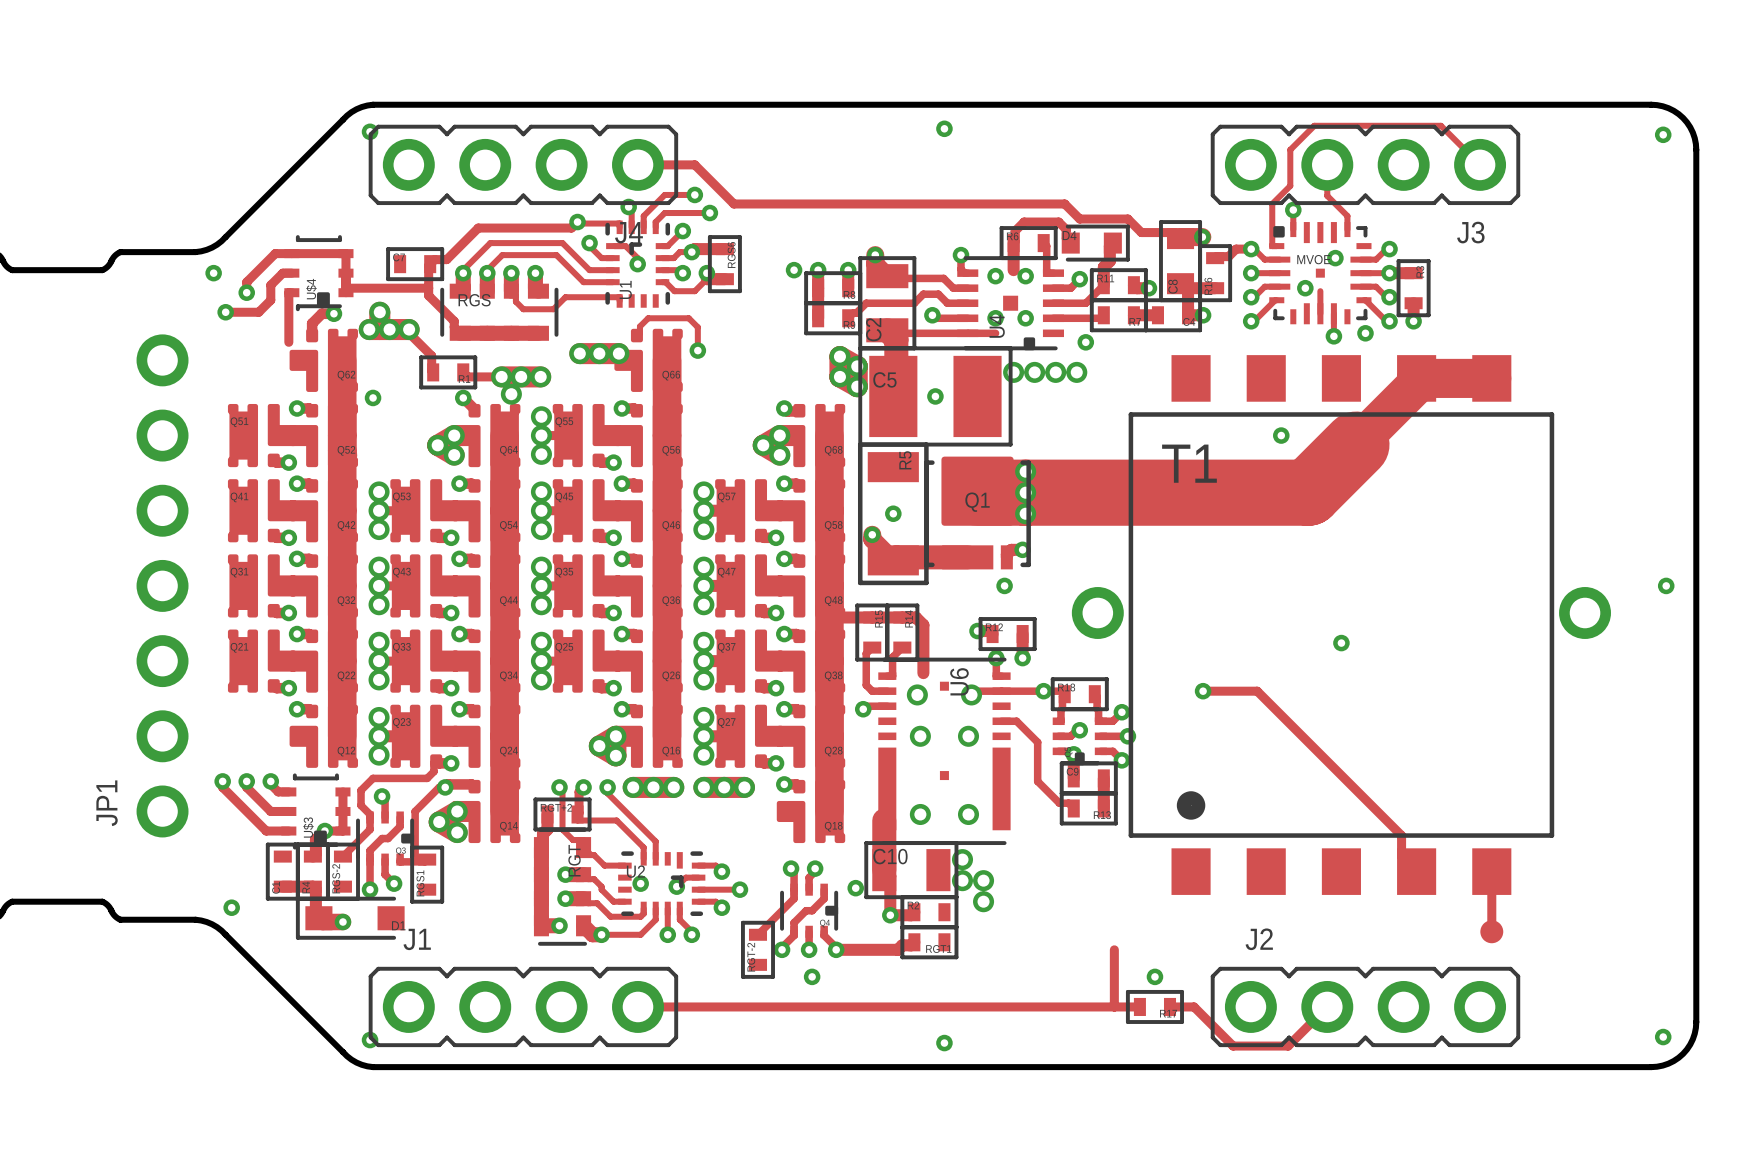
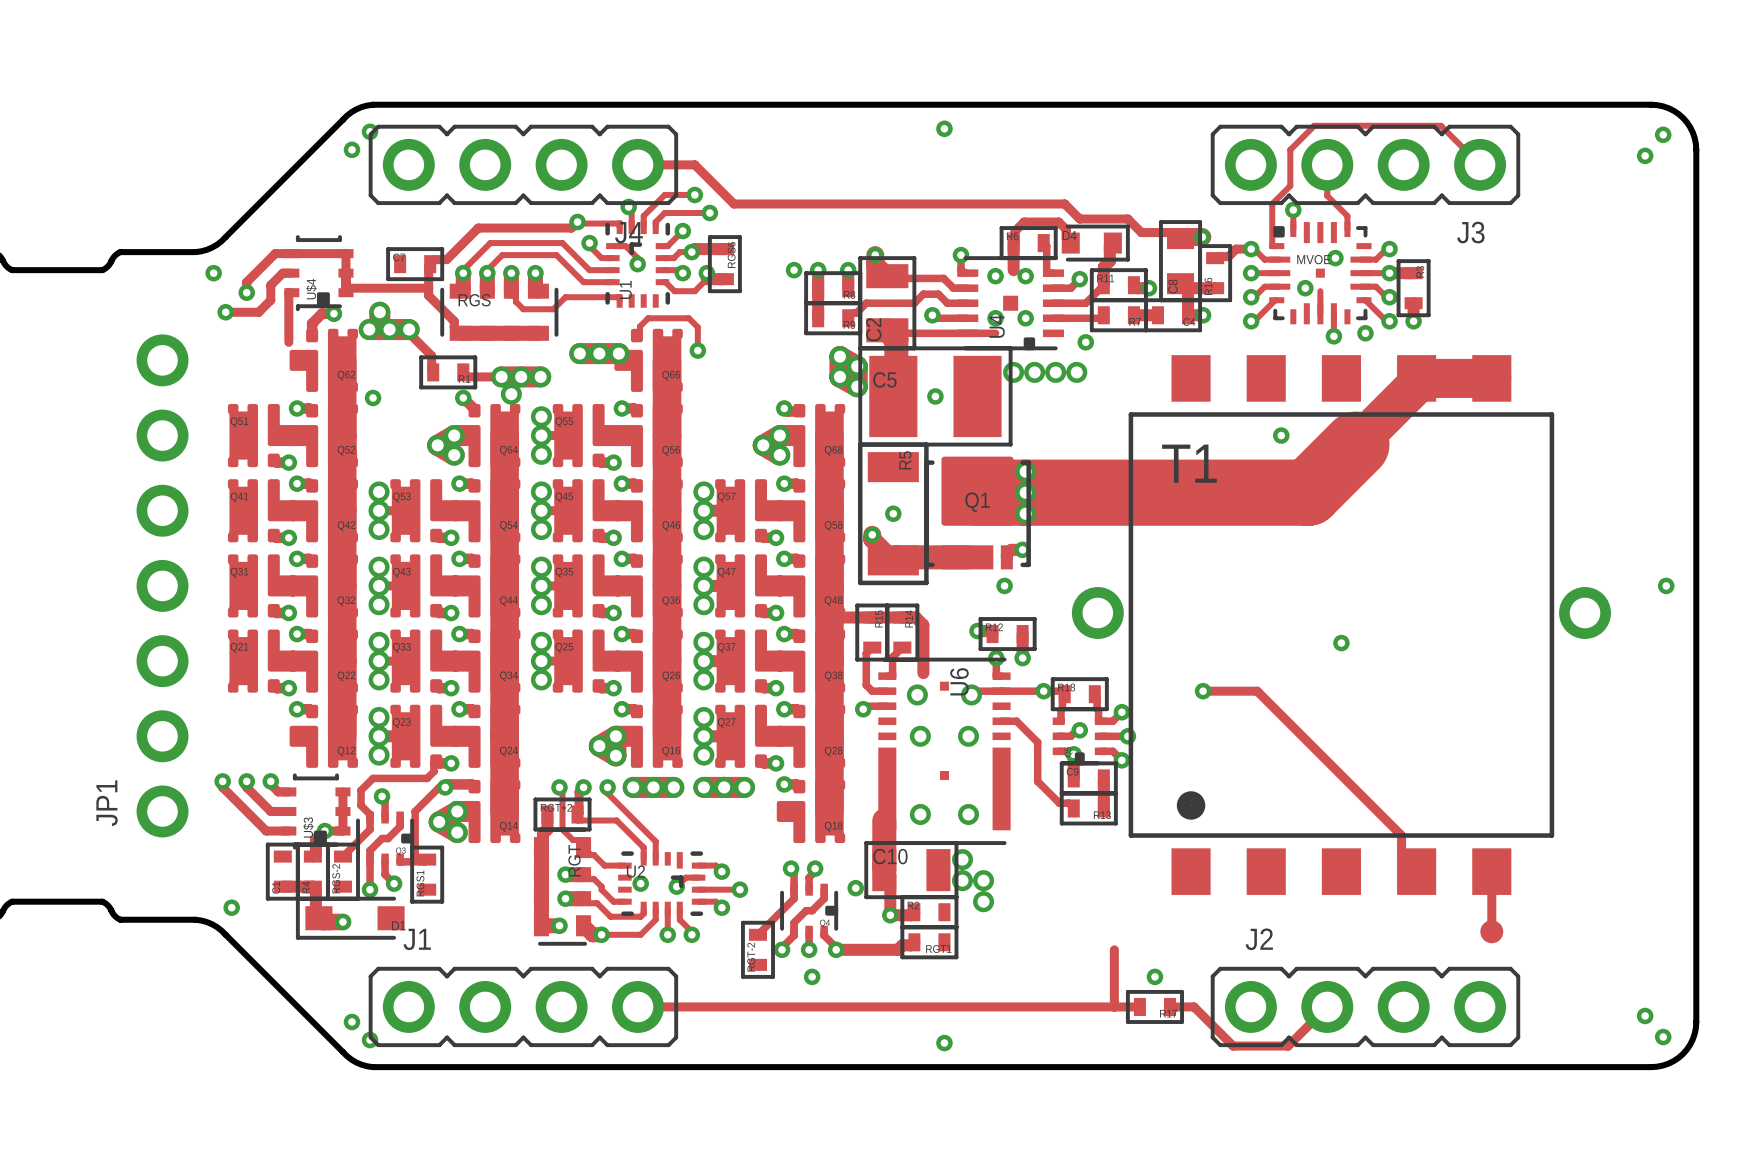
via: none -> (351, 149)
via: none -> (1645, 155)
via: none -> (1645, 1015)
via: none -> (351, 1022)

